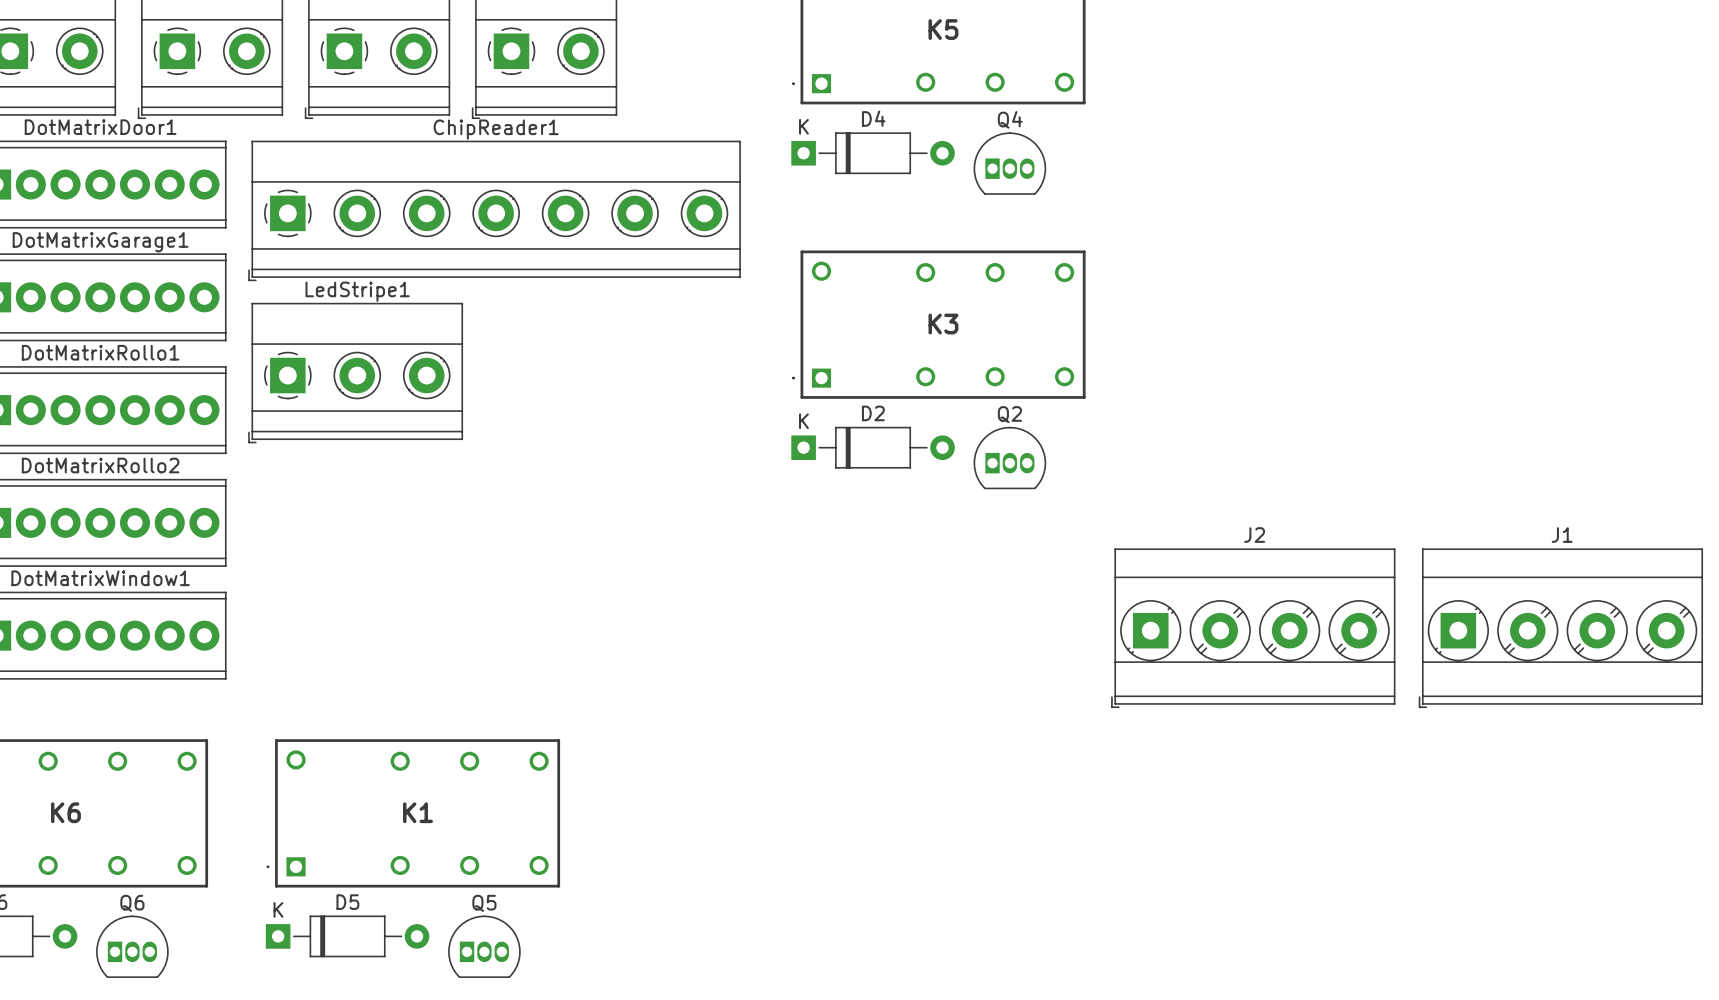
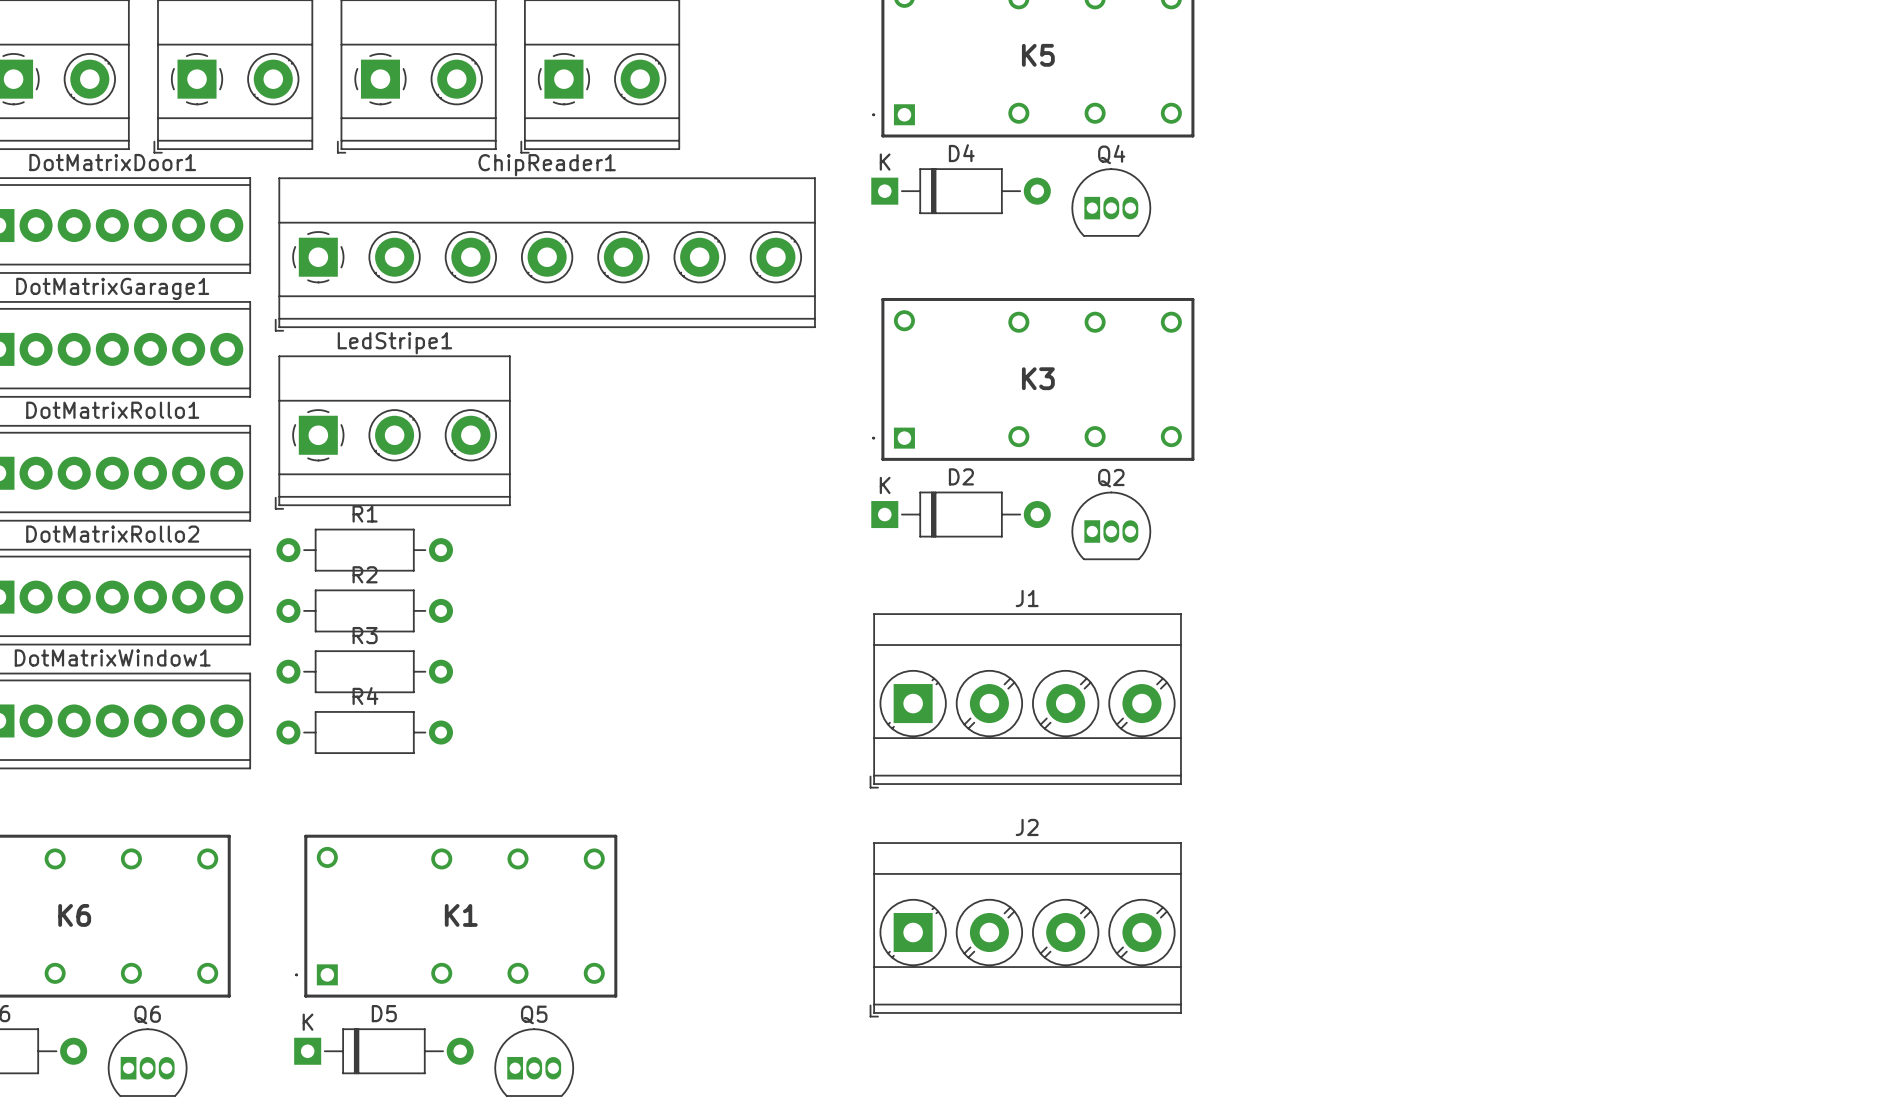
R1: none -> (364, 550)
R2: none -> (364, 610)
R3: none -> (364, 671)
J2 position: (1253, 628) -> (1025, 929)
J1 position: (1560, 628) -> (1025, 700)
R4: none -> (364, 732)

